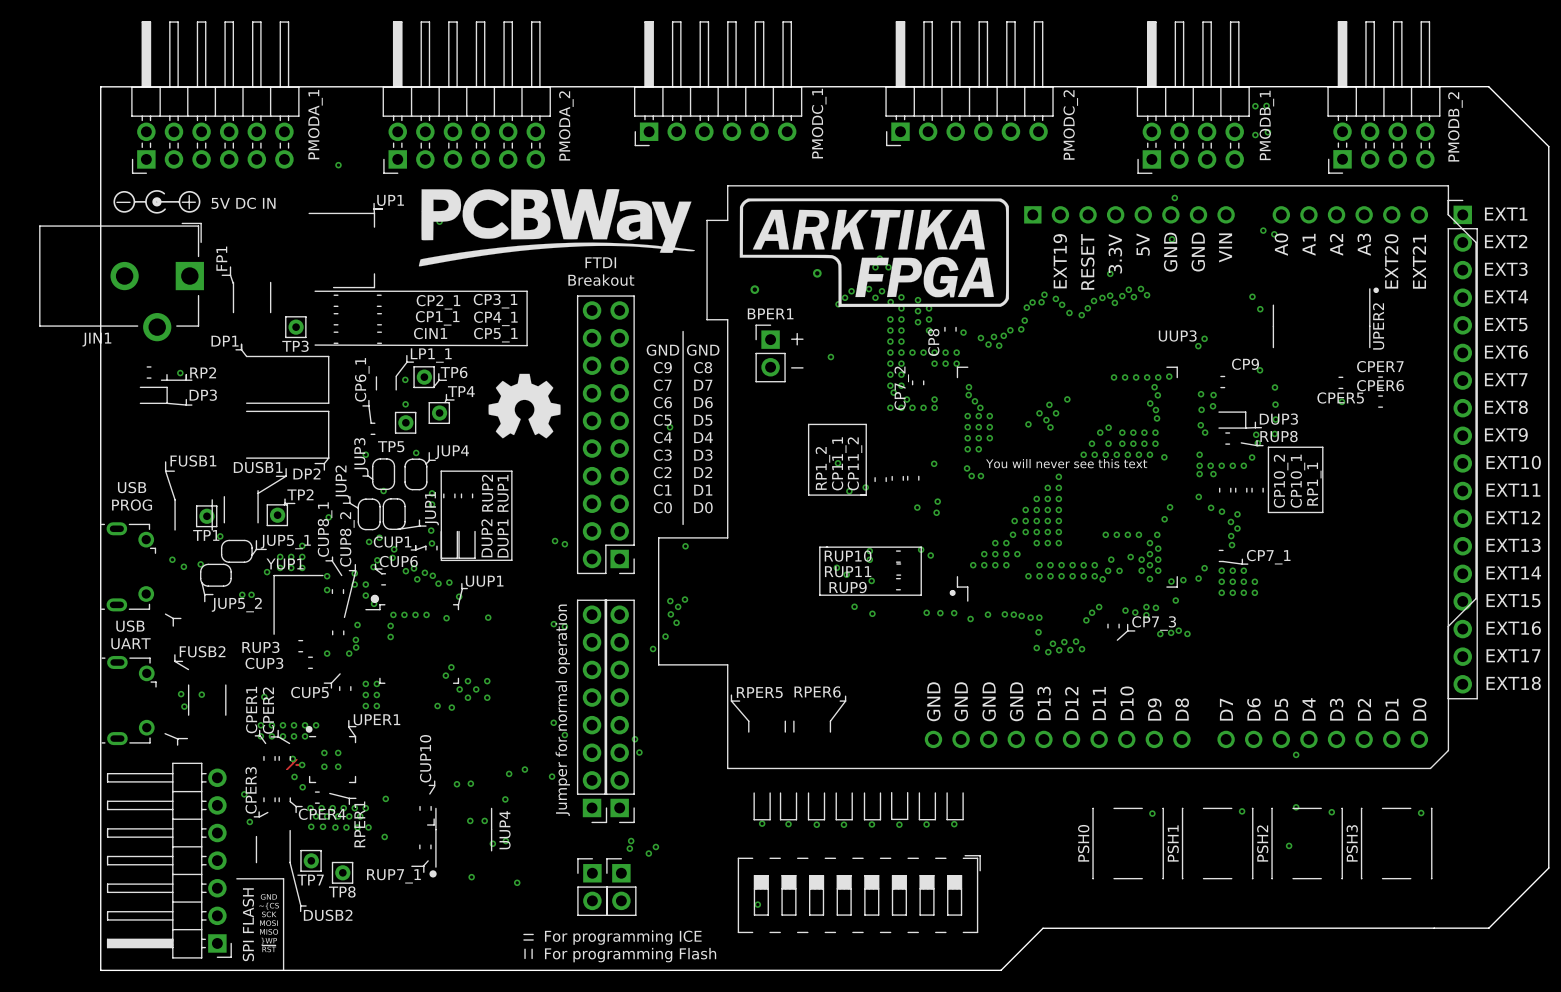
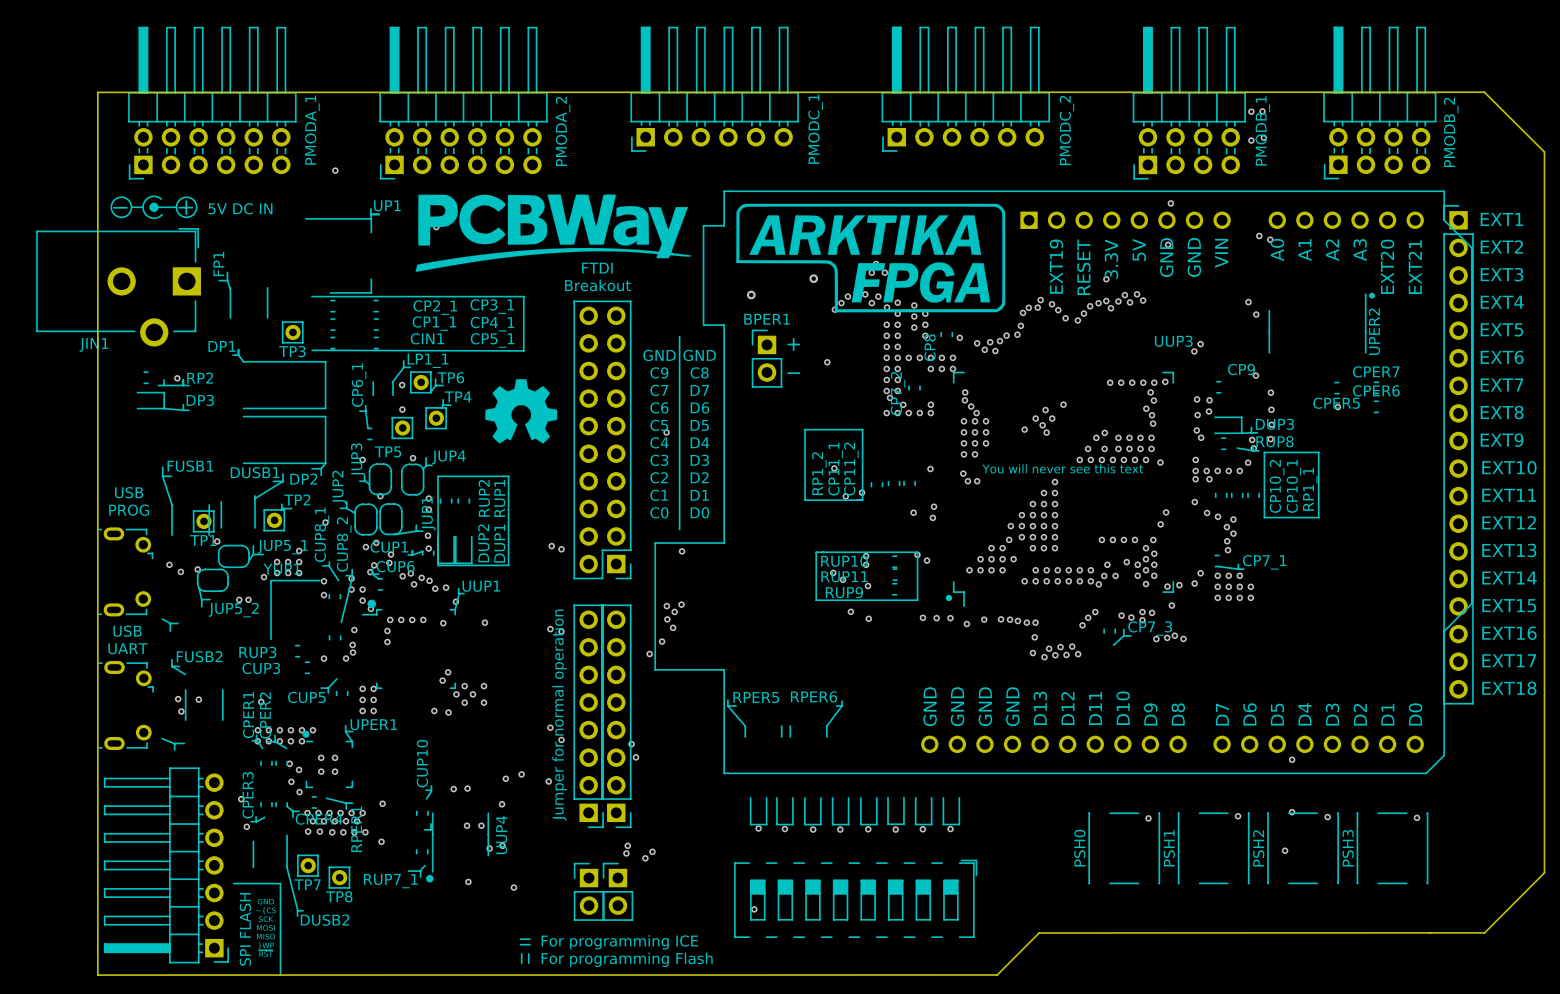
track: (296, 759) (287, 769) -> none
track: (296, 764) (302, 764) -> none

